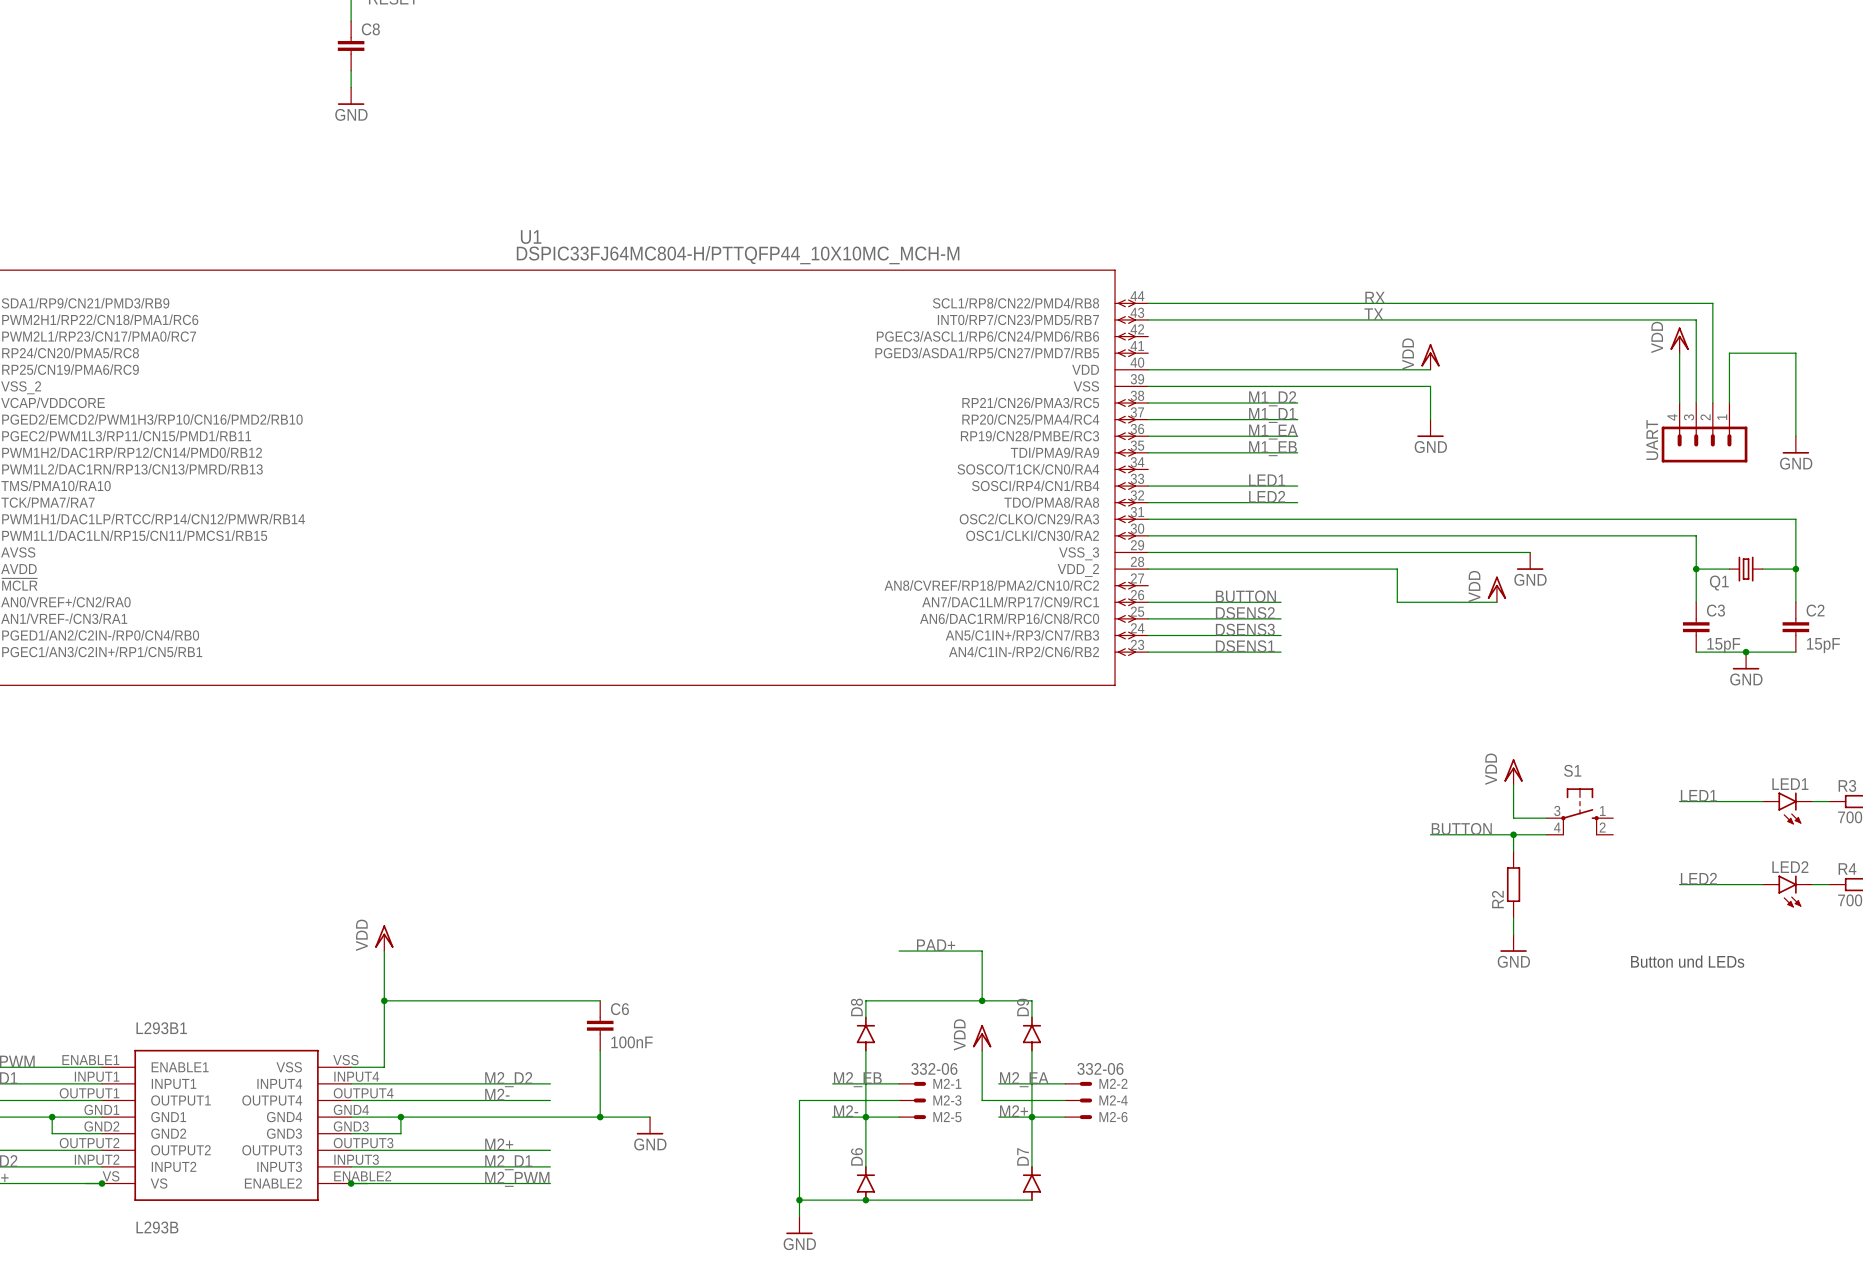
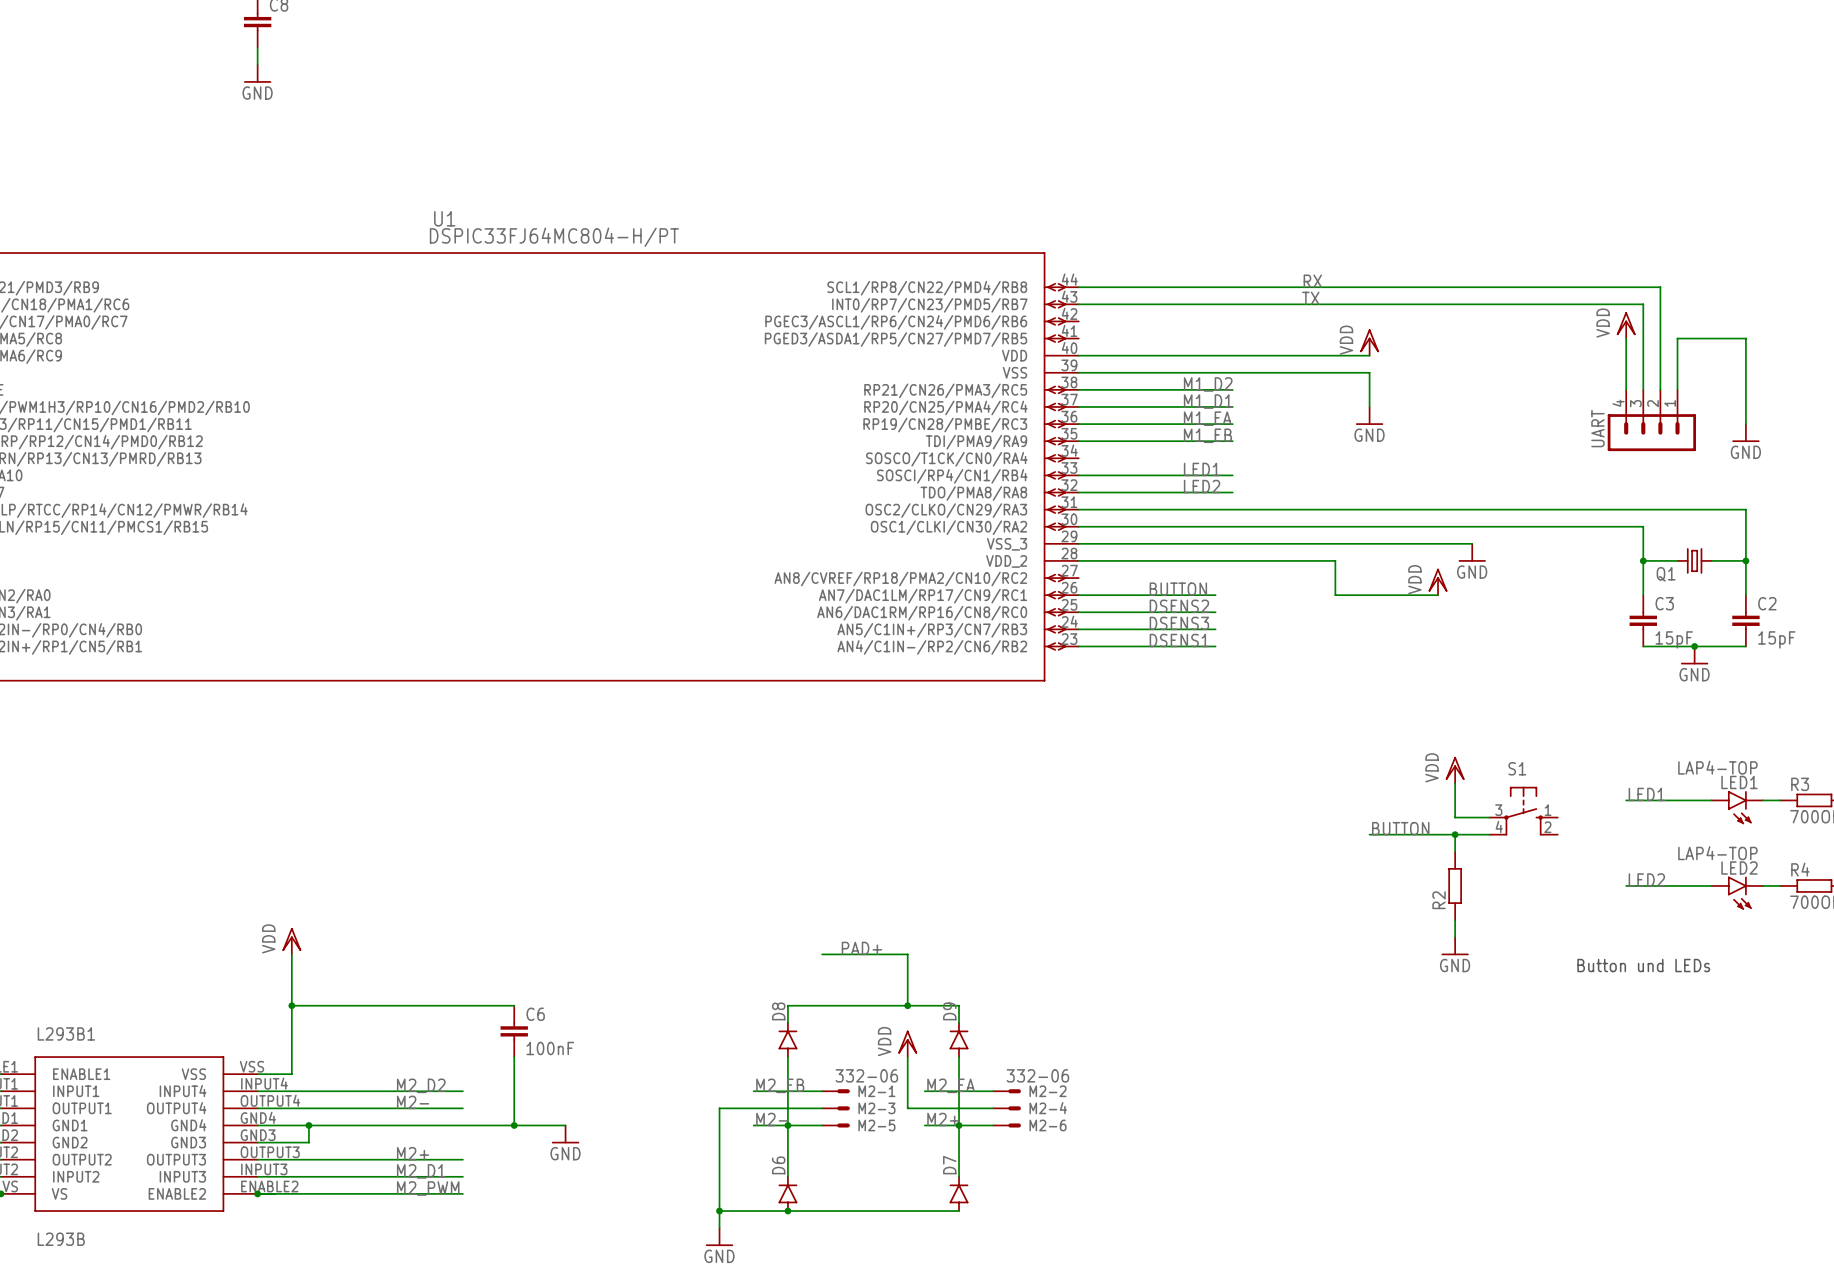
U1 value: DSPIC33FJ64MC804-H/PTTQFP44_10X10MC_MCH-M (738, 255) -> DSPIC33FJ64MC804-H/PT (554, 237)
LED1 value: none -> LAP4-TOP (1717, 767)
LED2 value: none -> LAP4-TOP (1717, 853)

